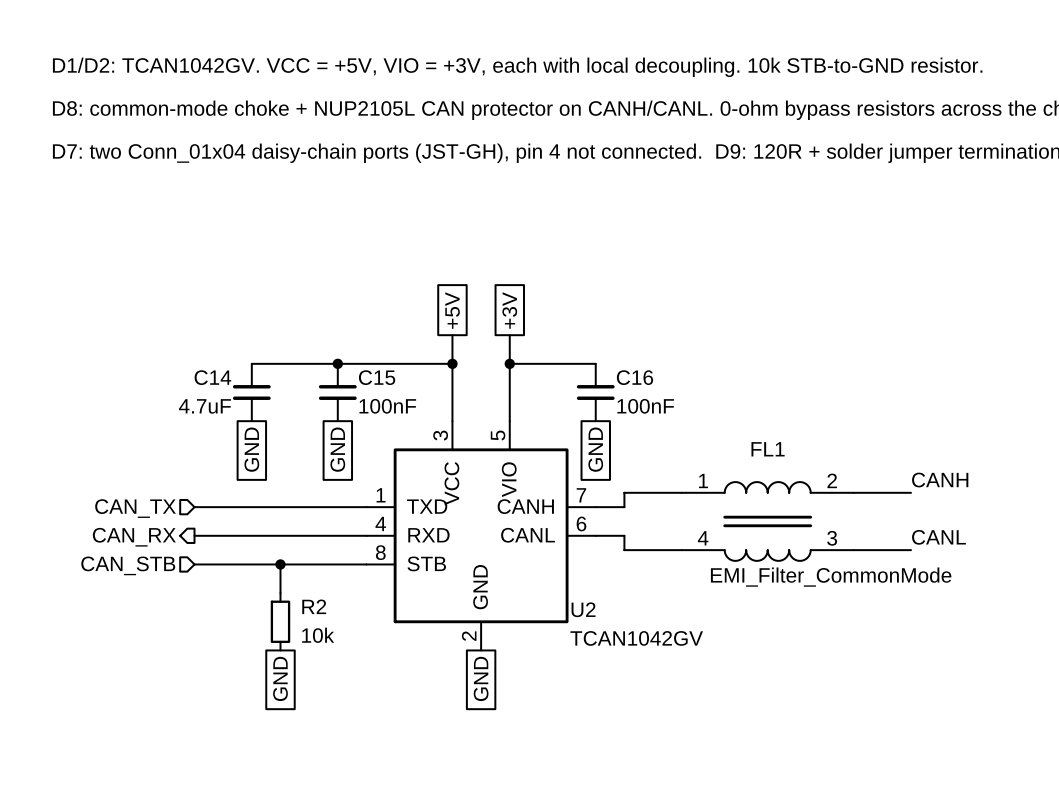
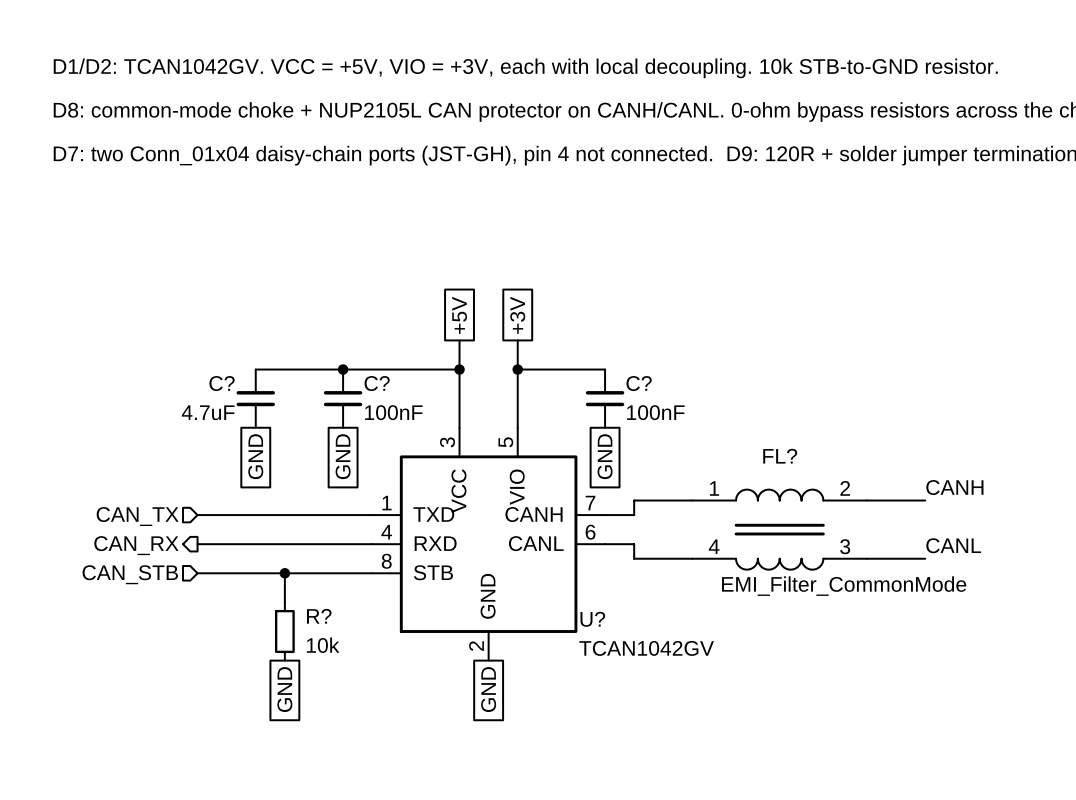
C14 name: C14 (212, 377) -> C? (222, 383)
C15 name: C15 (377, 377) -> C? (377, 383)
C16 name: C16 (634, 377) -> C? (639, 383)
FL1 name: FL1 (768, 449) -> FL? (780, 456)
R2 name: R2 (314, 606) -> R? (319, 616)
U2 name: U2 (583, 609) -> U? (592, 619)

